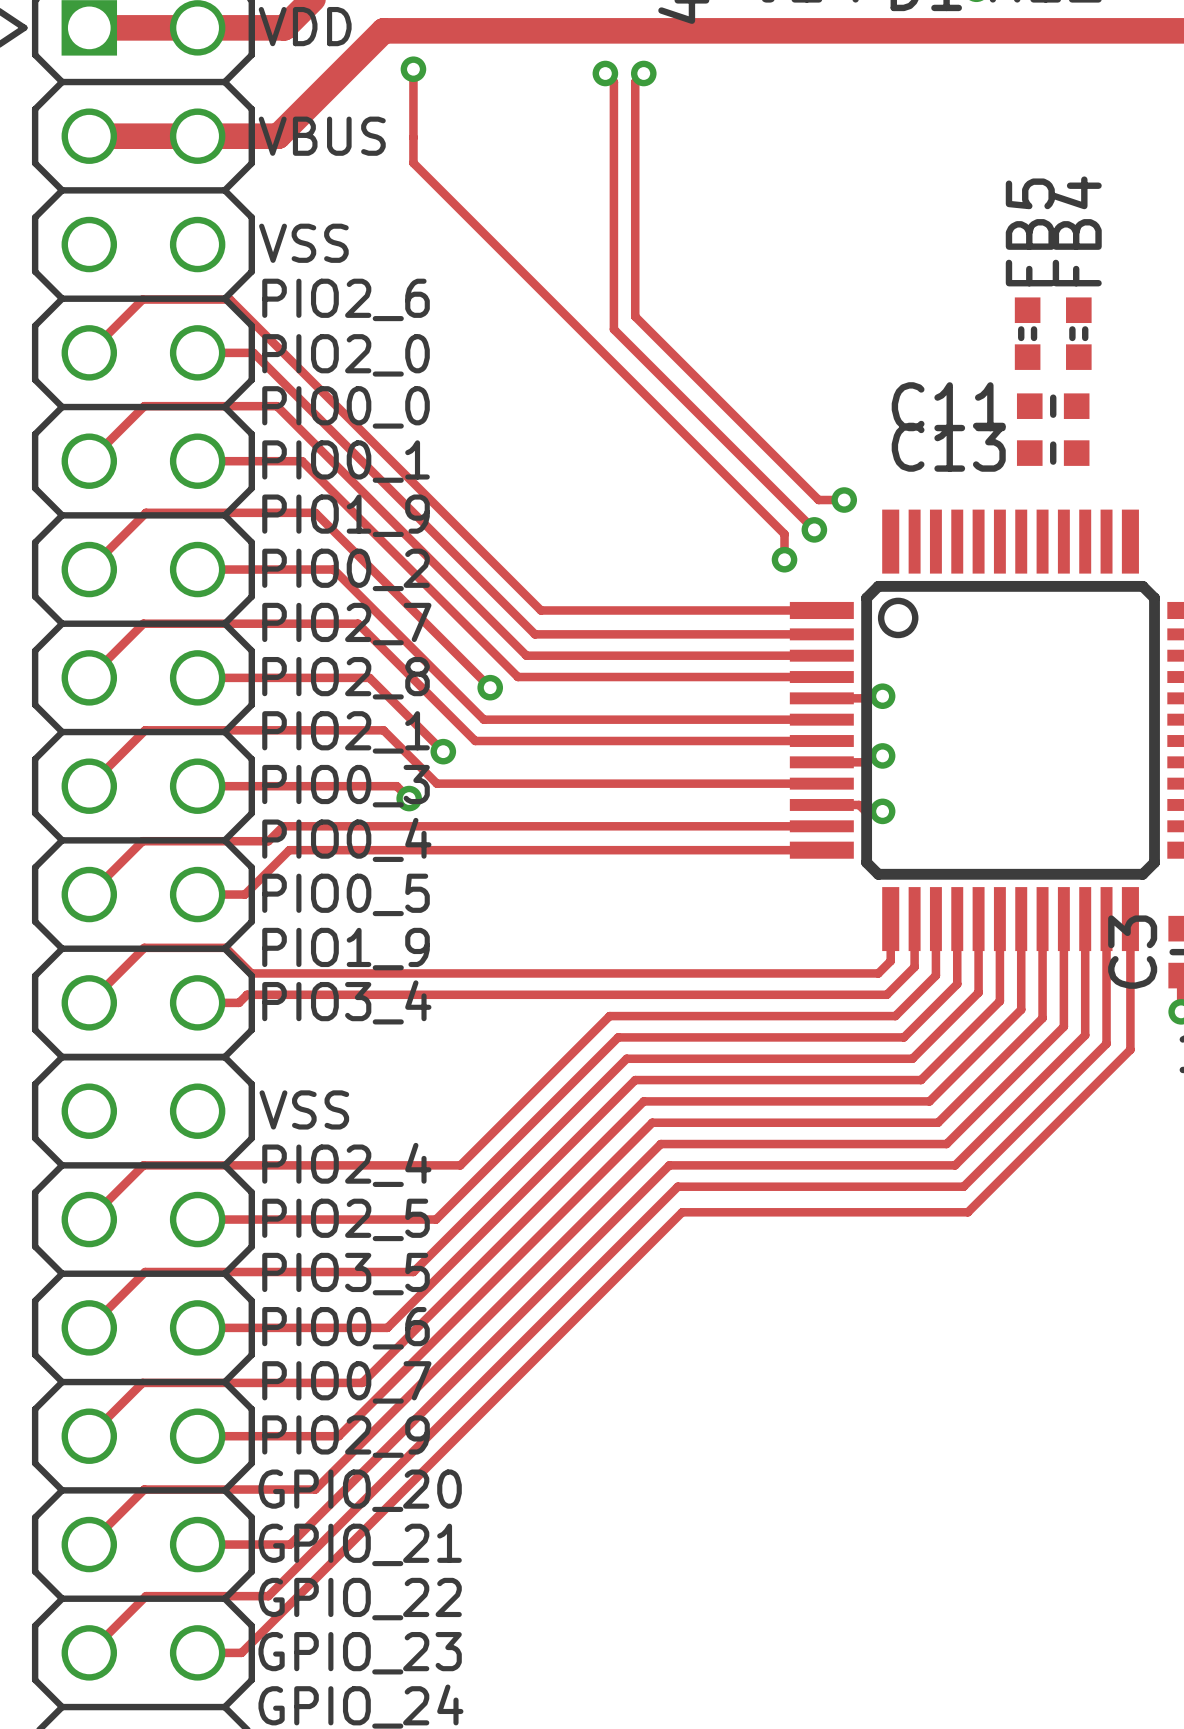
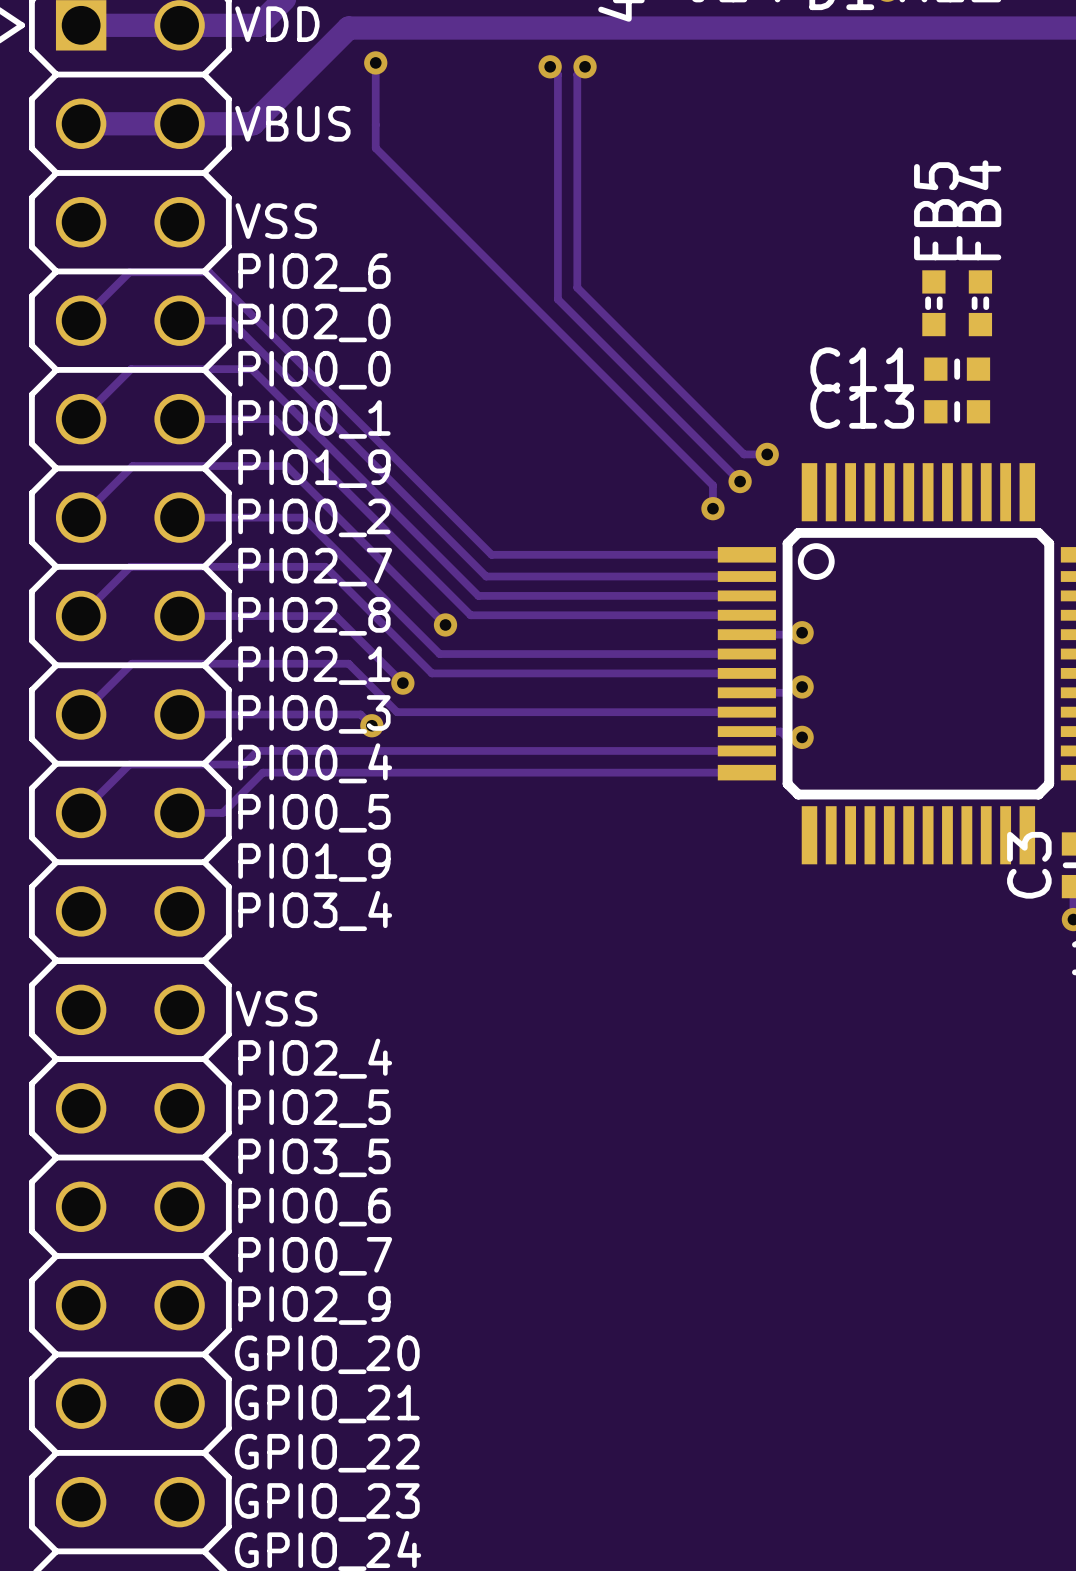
track: (890, 919) (890, 961) (878, 973) (251, 973) (225, 947) (144, 947) (89, 1002) -> none
track: (914, 919) (914, 967) (886, 994) (247, 994) (239, 1002) (197, 1002) -> none
track: (935, 919) (935, 975) (895, 1016) (609, 1016) (460, 1165) (143, 1165) (89, 1219) -> none
track: (957, 919) (957, 984) (903, 1037) (618, 1037) (436, 1219) (197, 1219) -> none
track: (978, 919) (978, 992) (912, 1058) (626, 1058) (413, 1272) (145, 1272) (89, 1327) -> none
track: (999, 919) (999, 1001) (921, 1080) (635, 1080) (387, 1327) (197, 1327) -> none
track: (1021, 919) (1021, 1009) (929, 1101) (643, 1101) (362, 1382) (142, 1382) (89, 1436) -> none
track: (1042, 919) (1042, 1018) (938, 1122) (652, 1122) (338, 1436) (197, 1436) -> none
track: (1063, 919) (1063, 1026) (946, 1144) (660, 1144) (315, 1489) (144, 1489) (89, 1544) -> none
track: (1085, 919) (1085, 1035) (955, 1165) (669, 1165) (290, 1544) (197, 1544) -> none
track: (1106, 919) (1106, 1043) (963, 1186) (677, 1186) (268, 1596) (146, 1596) (89, 1652) -> none
track: (1130, 919) (1130, 1049) (967, 1212) (682, 1212) (241, 1652) (197, 1652) -> none

